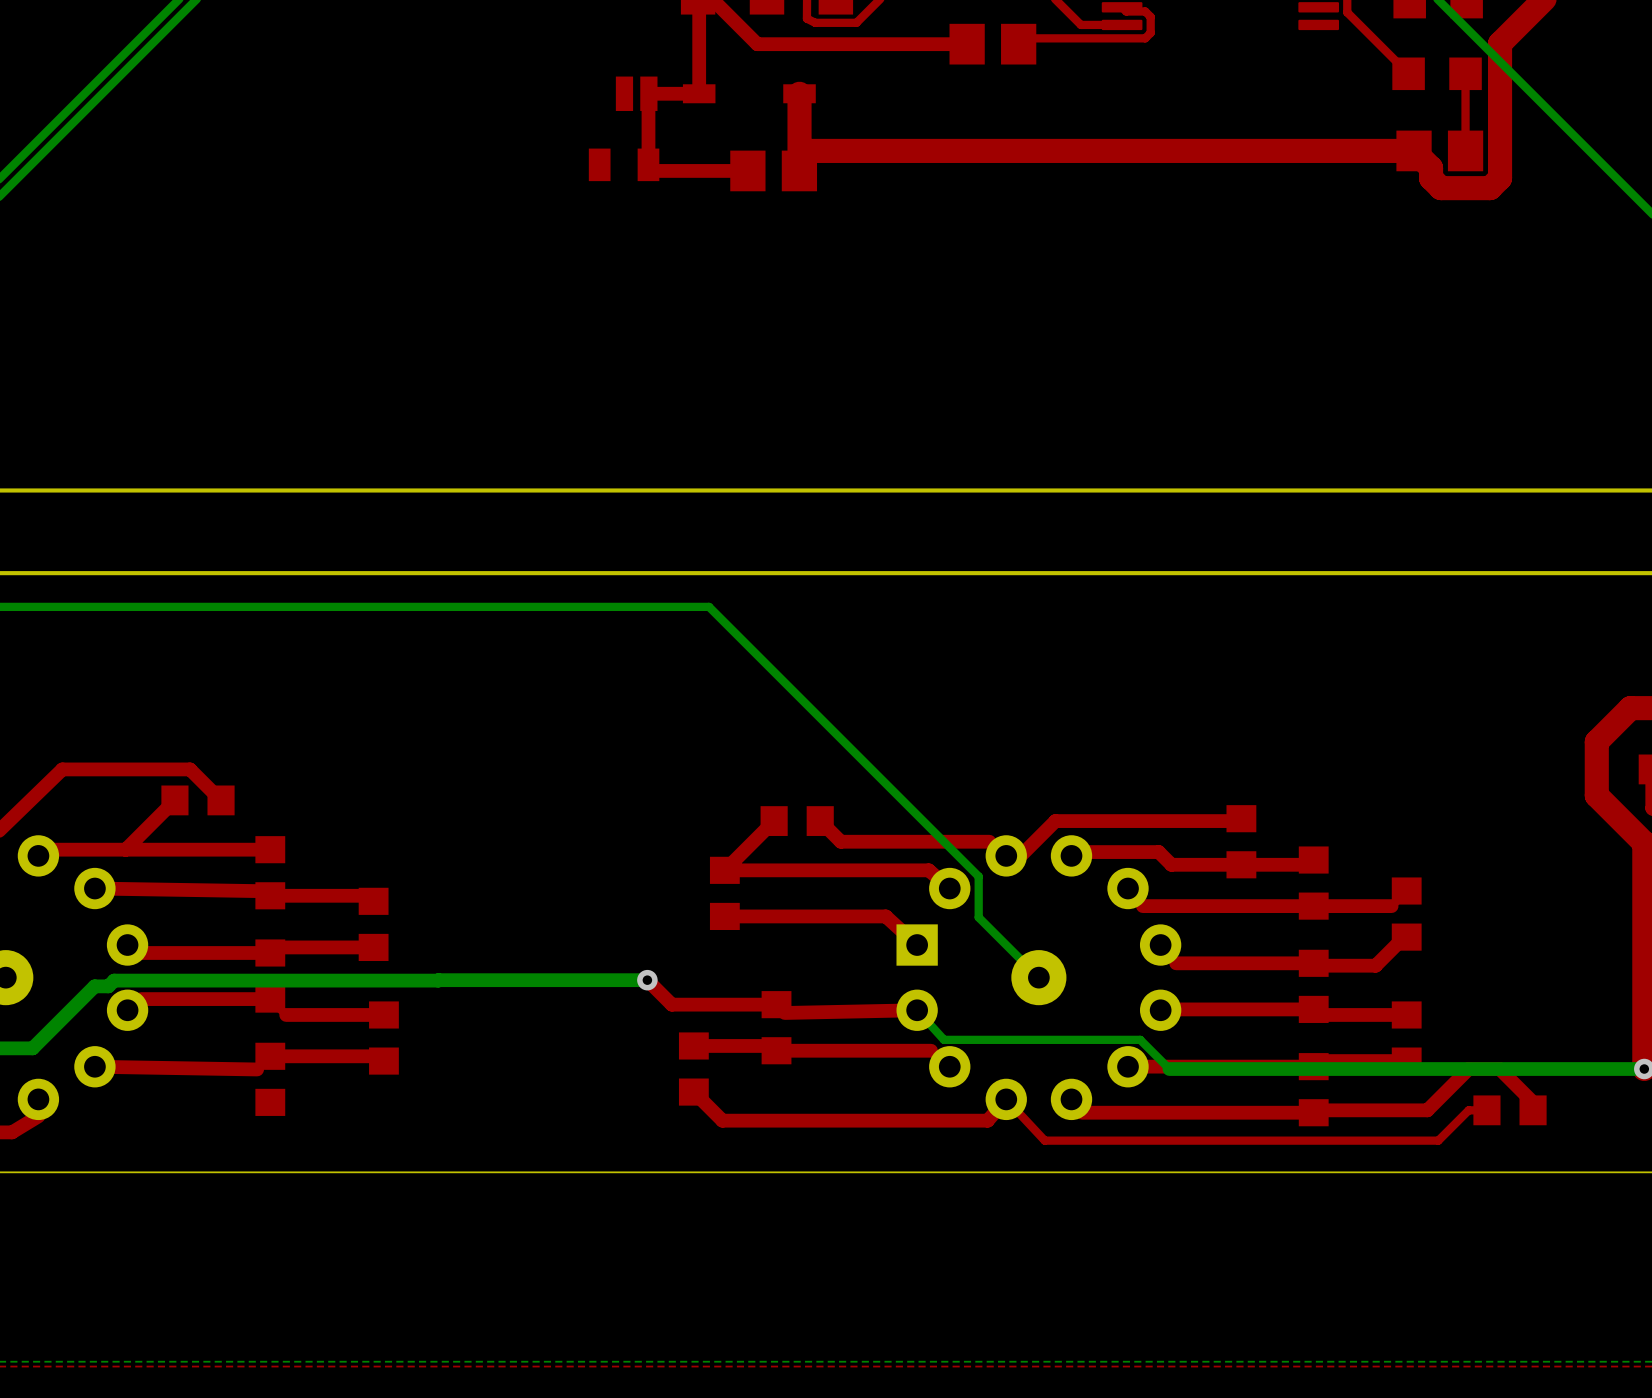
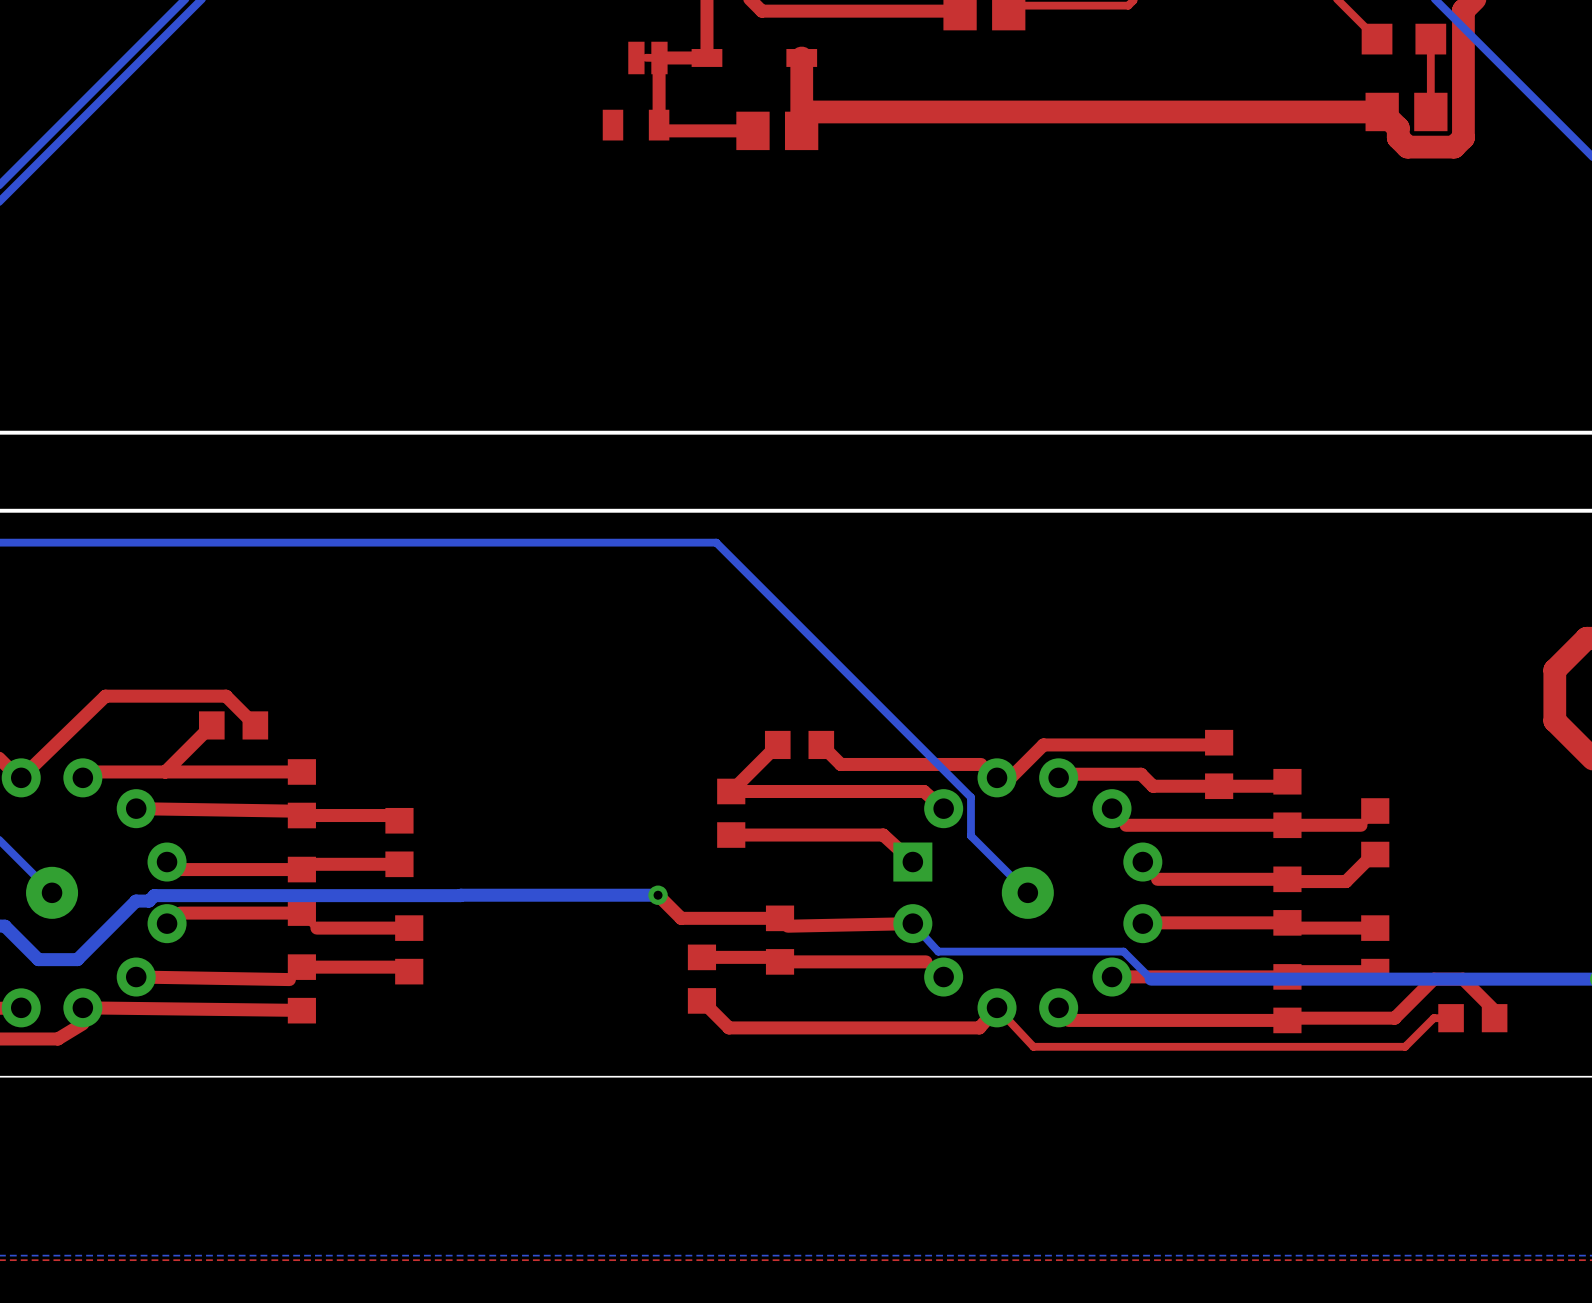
top track: none -> (646, 57) (659, 57)
top track: none -> (82, 1007) (301, 1010)

